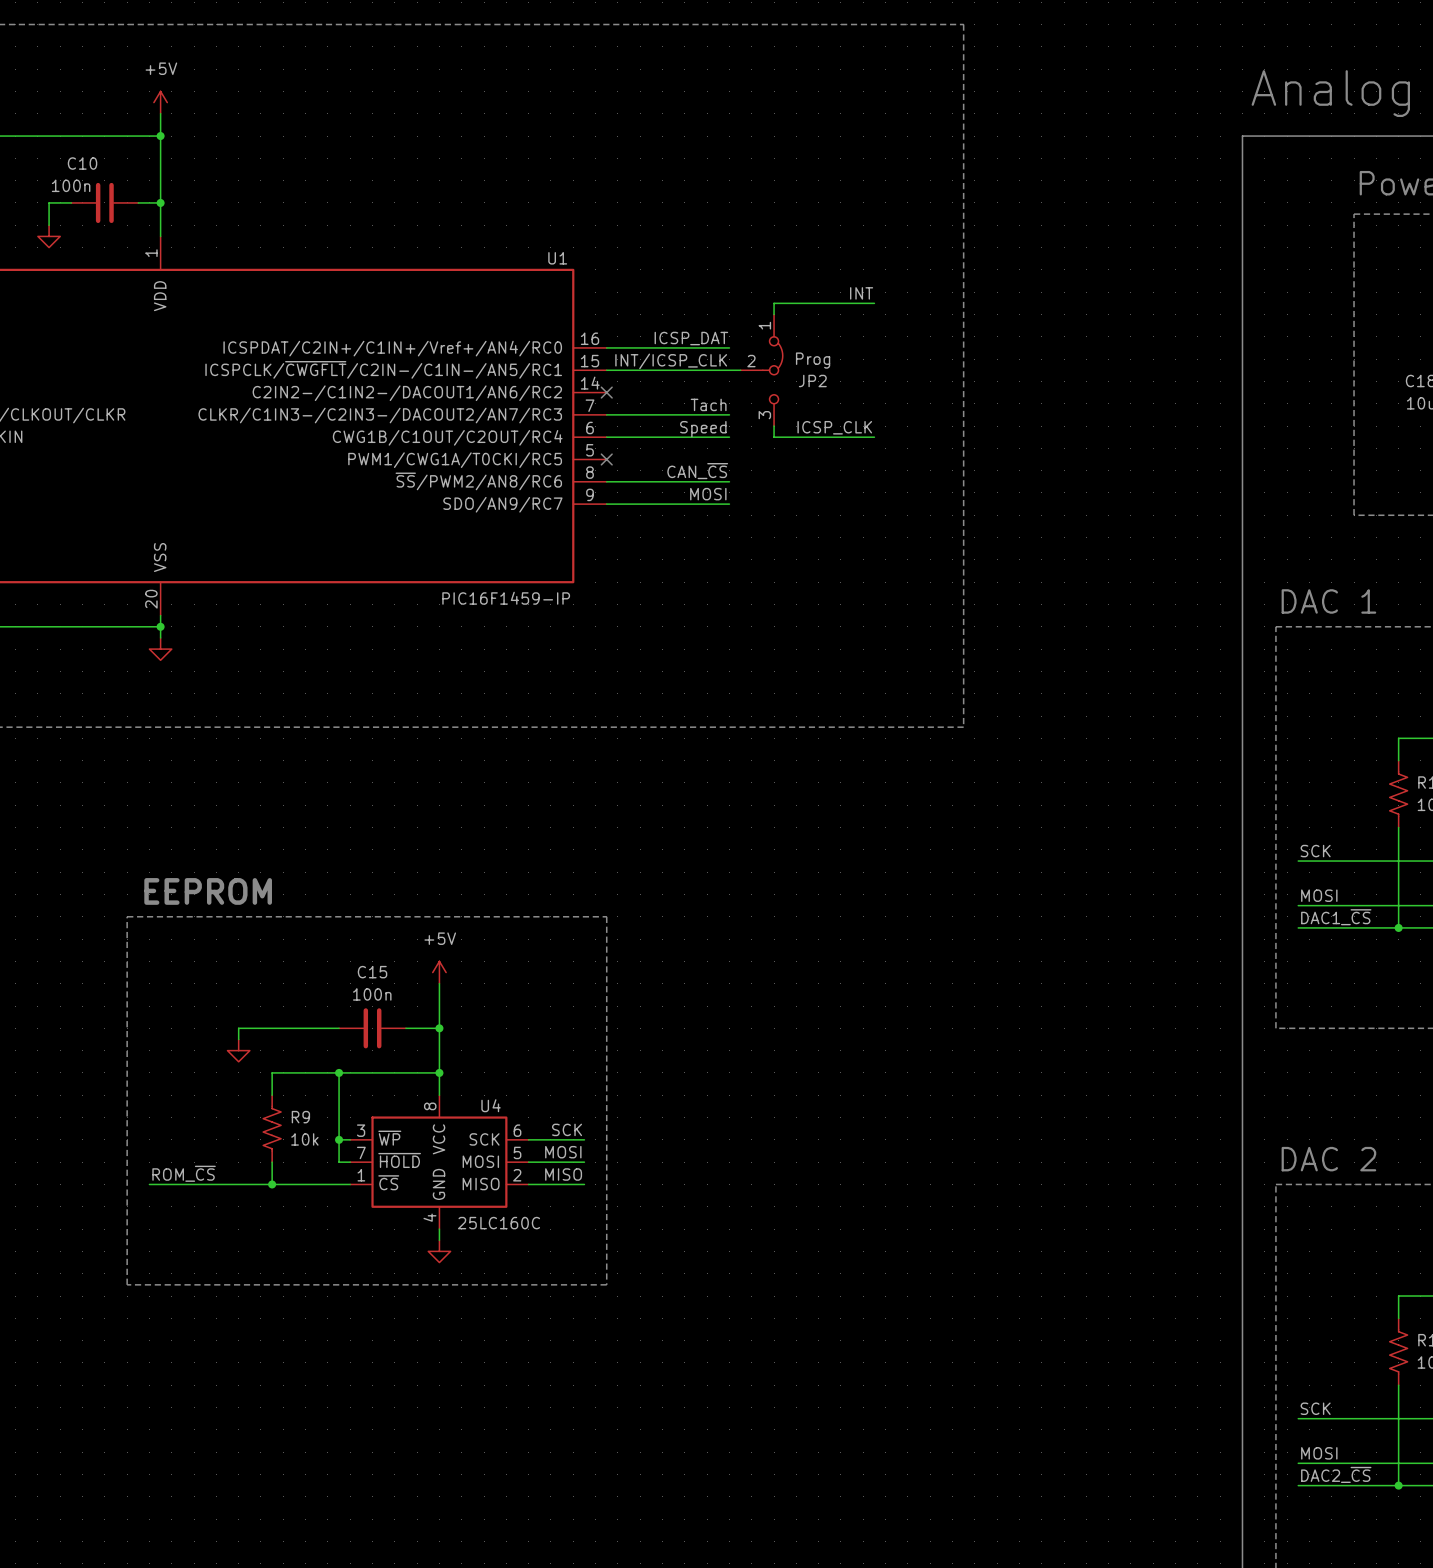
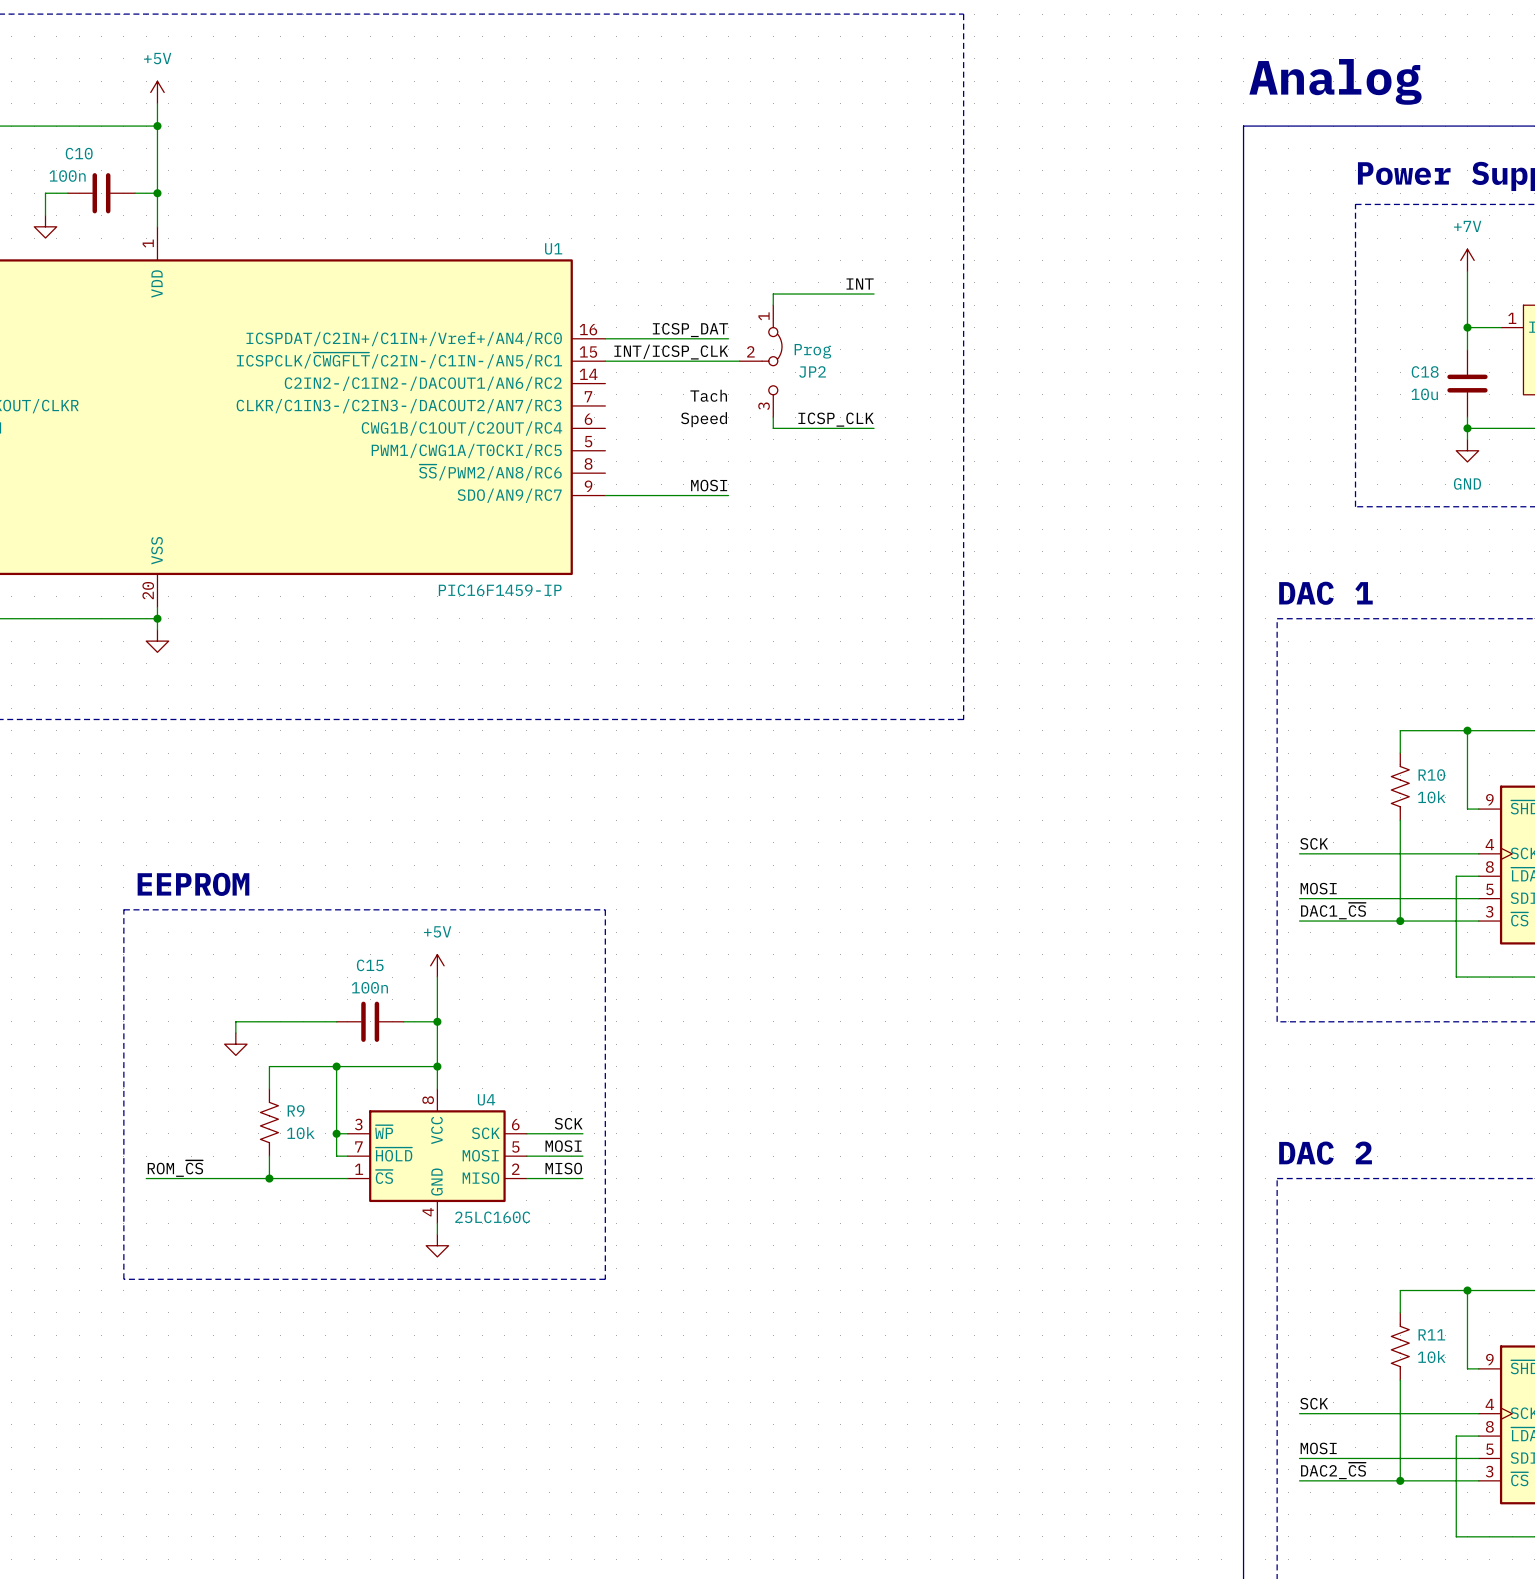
no-connect mark: (606, 392) -> none
wire: (606, 414) (729, 414) -> none
wire: (606, 437) (729, 437) -> none
no-connect mark: (606, 459) -> none
label: CAN_~{CS} (697, 471) -> none
wire: (606, 481) (729, 481) -> none

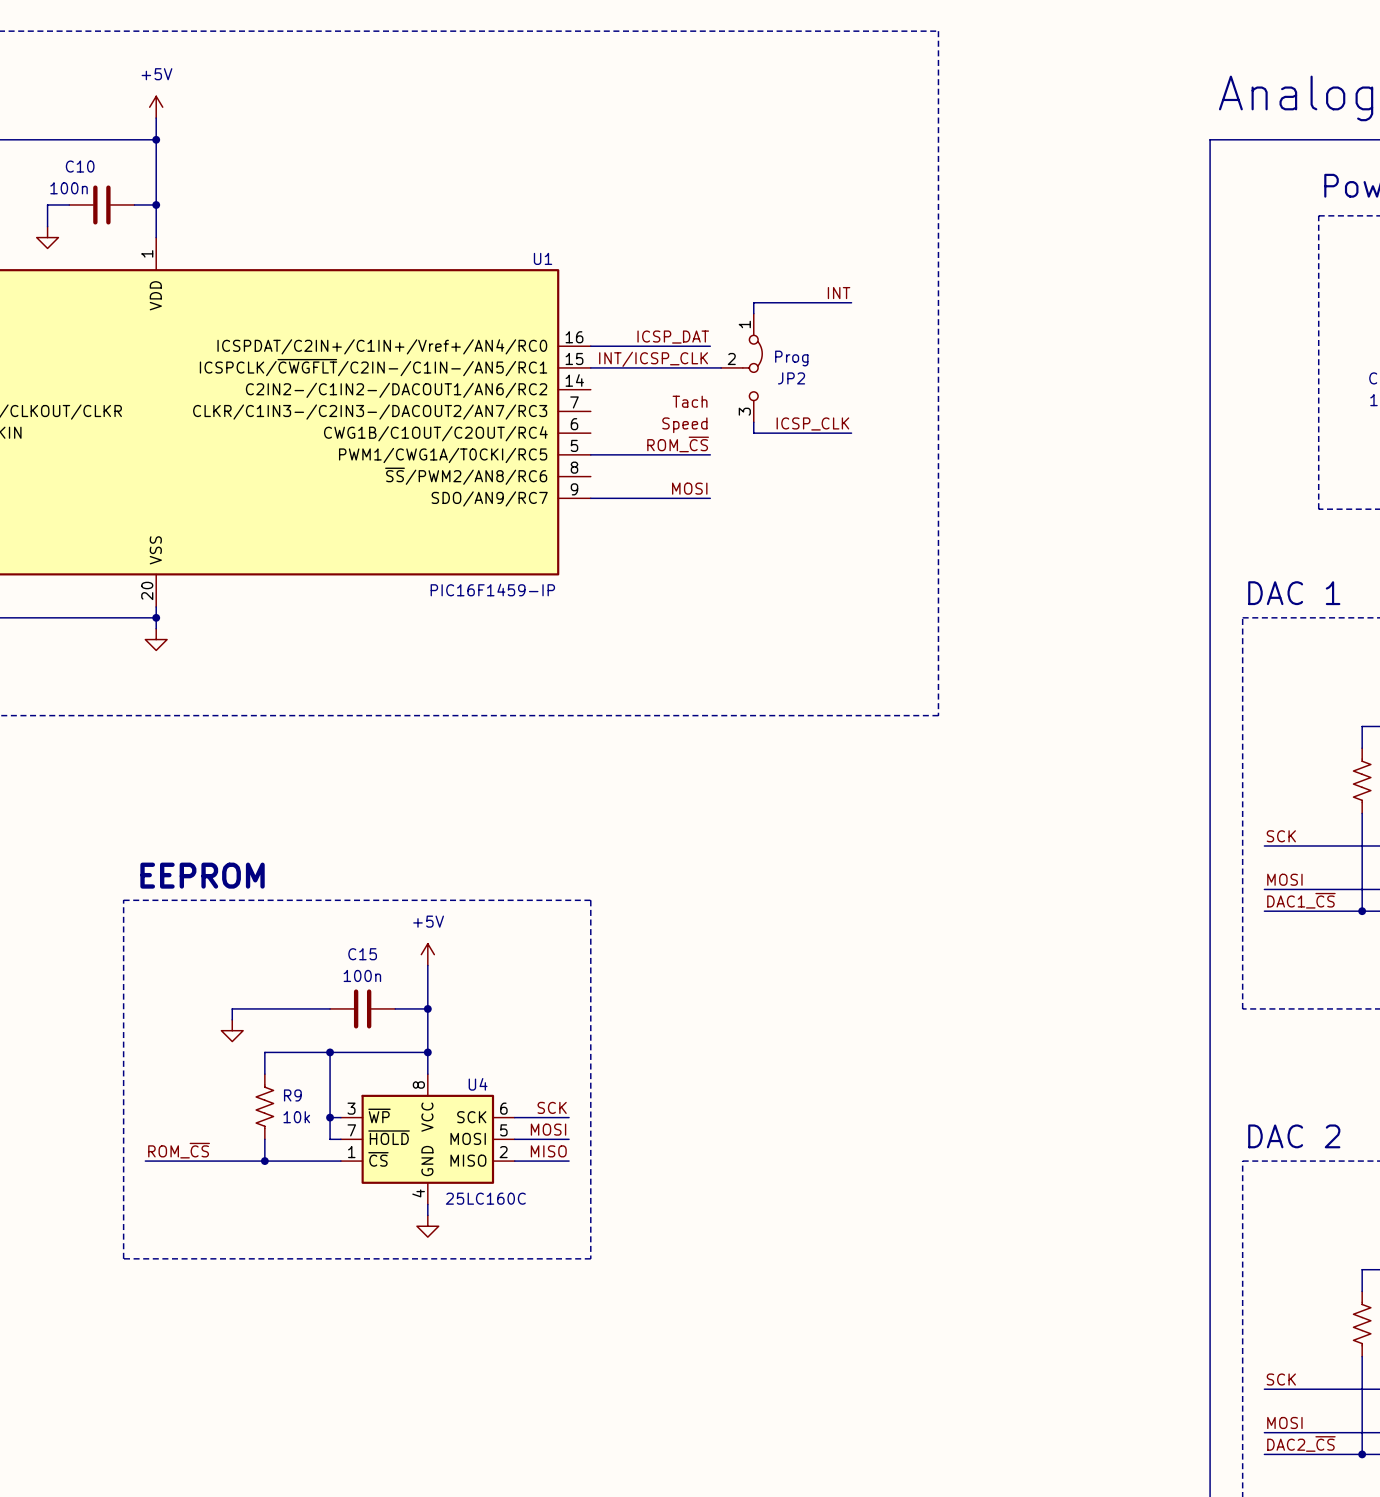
label: none -> ROM_~{CS} (678, 444)
wire: none -> (590, 454) (710, 454)

